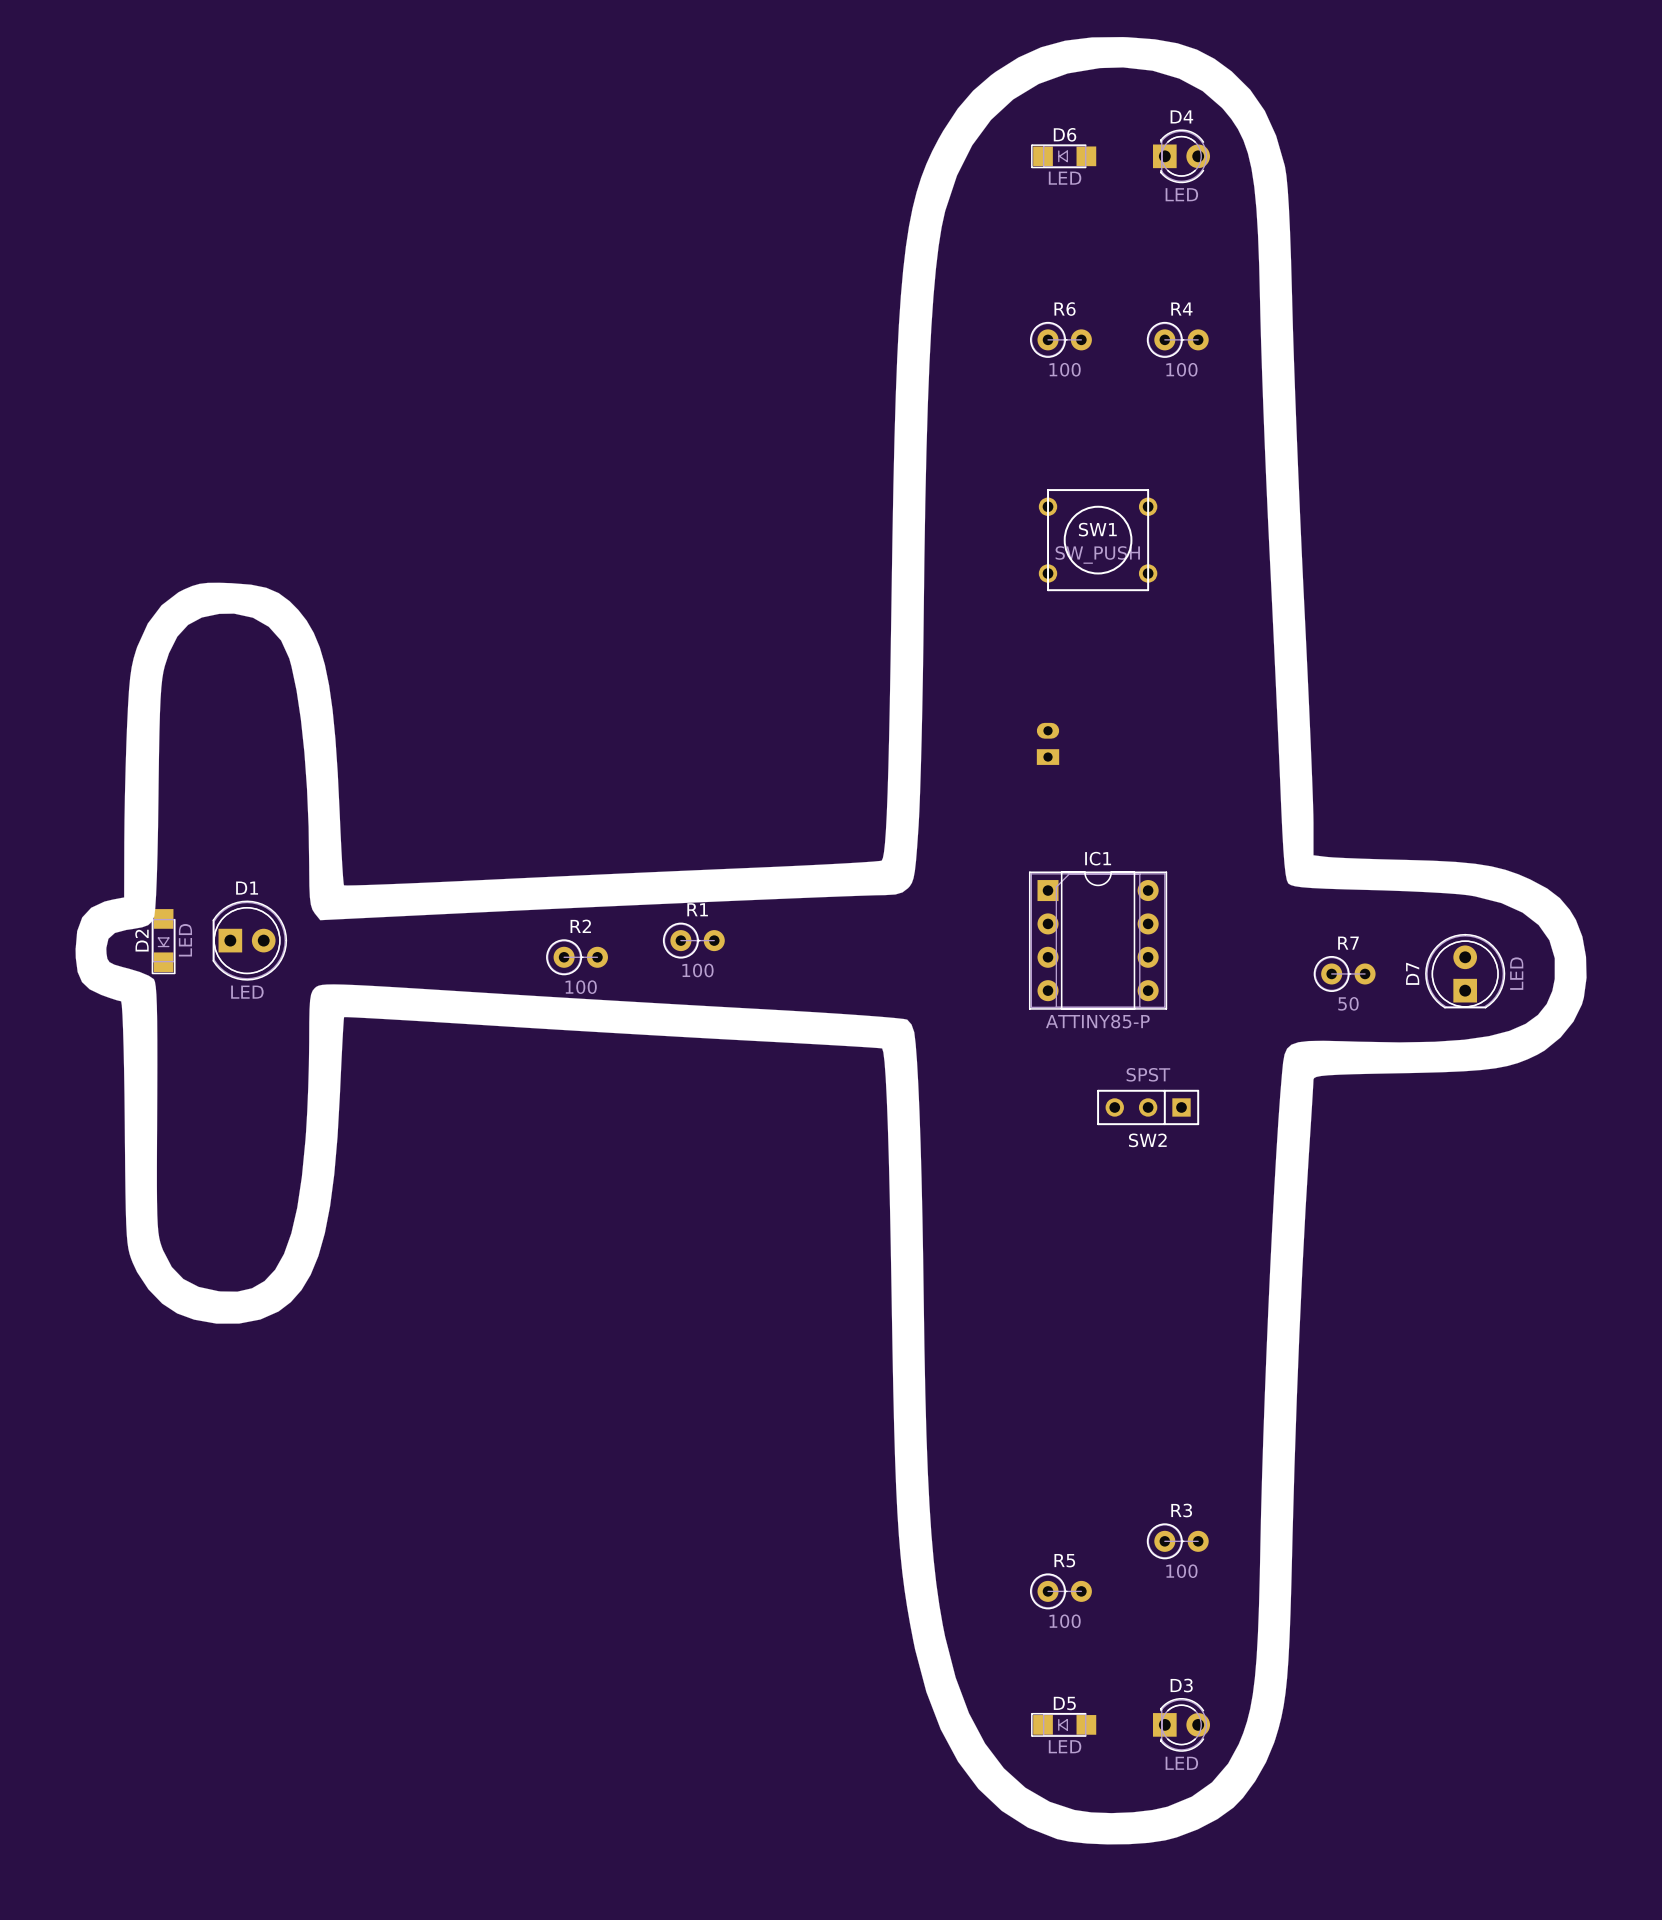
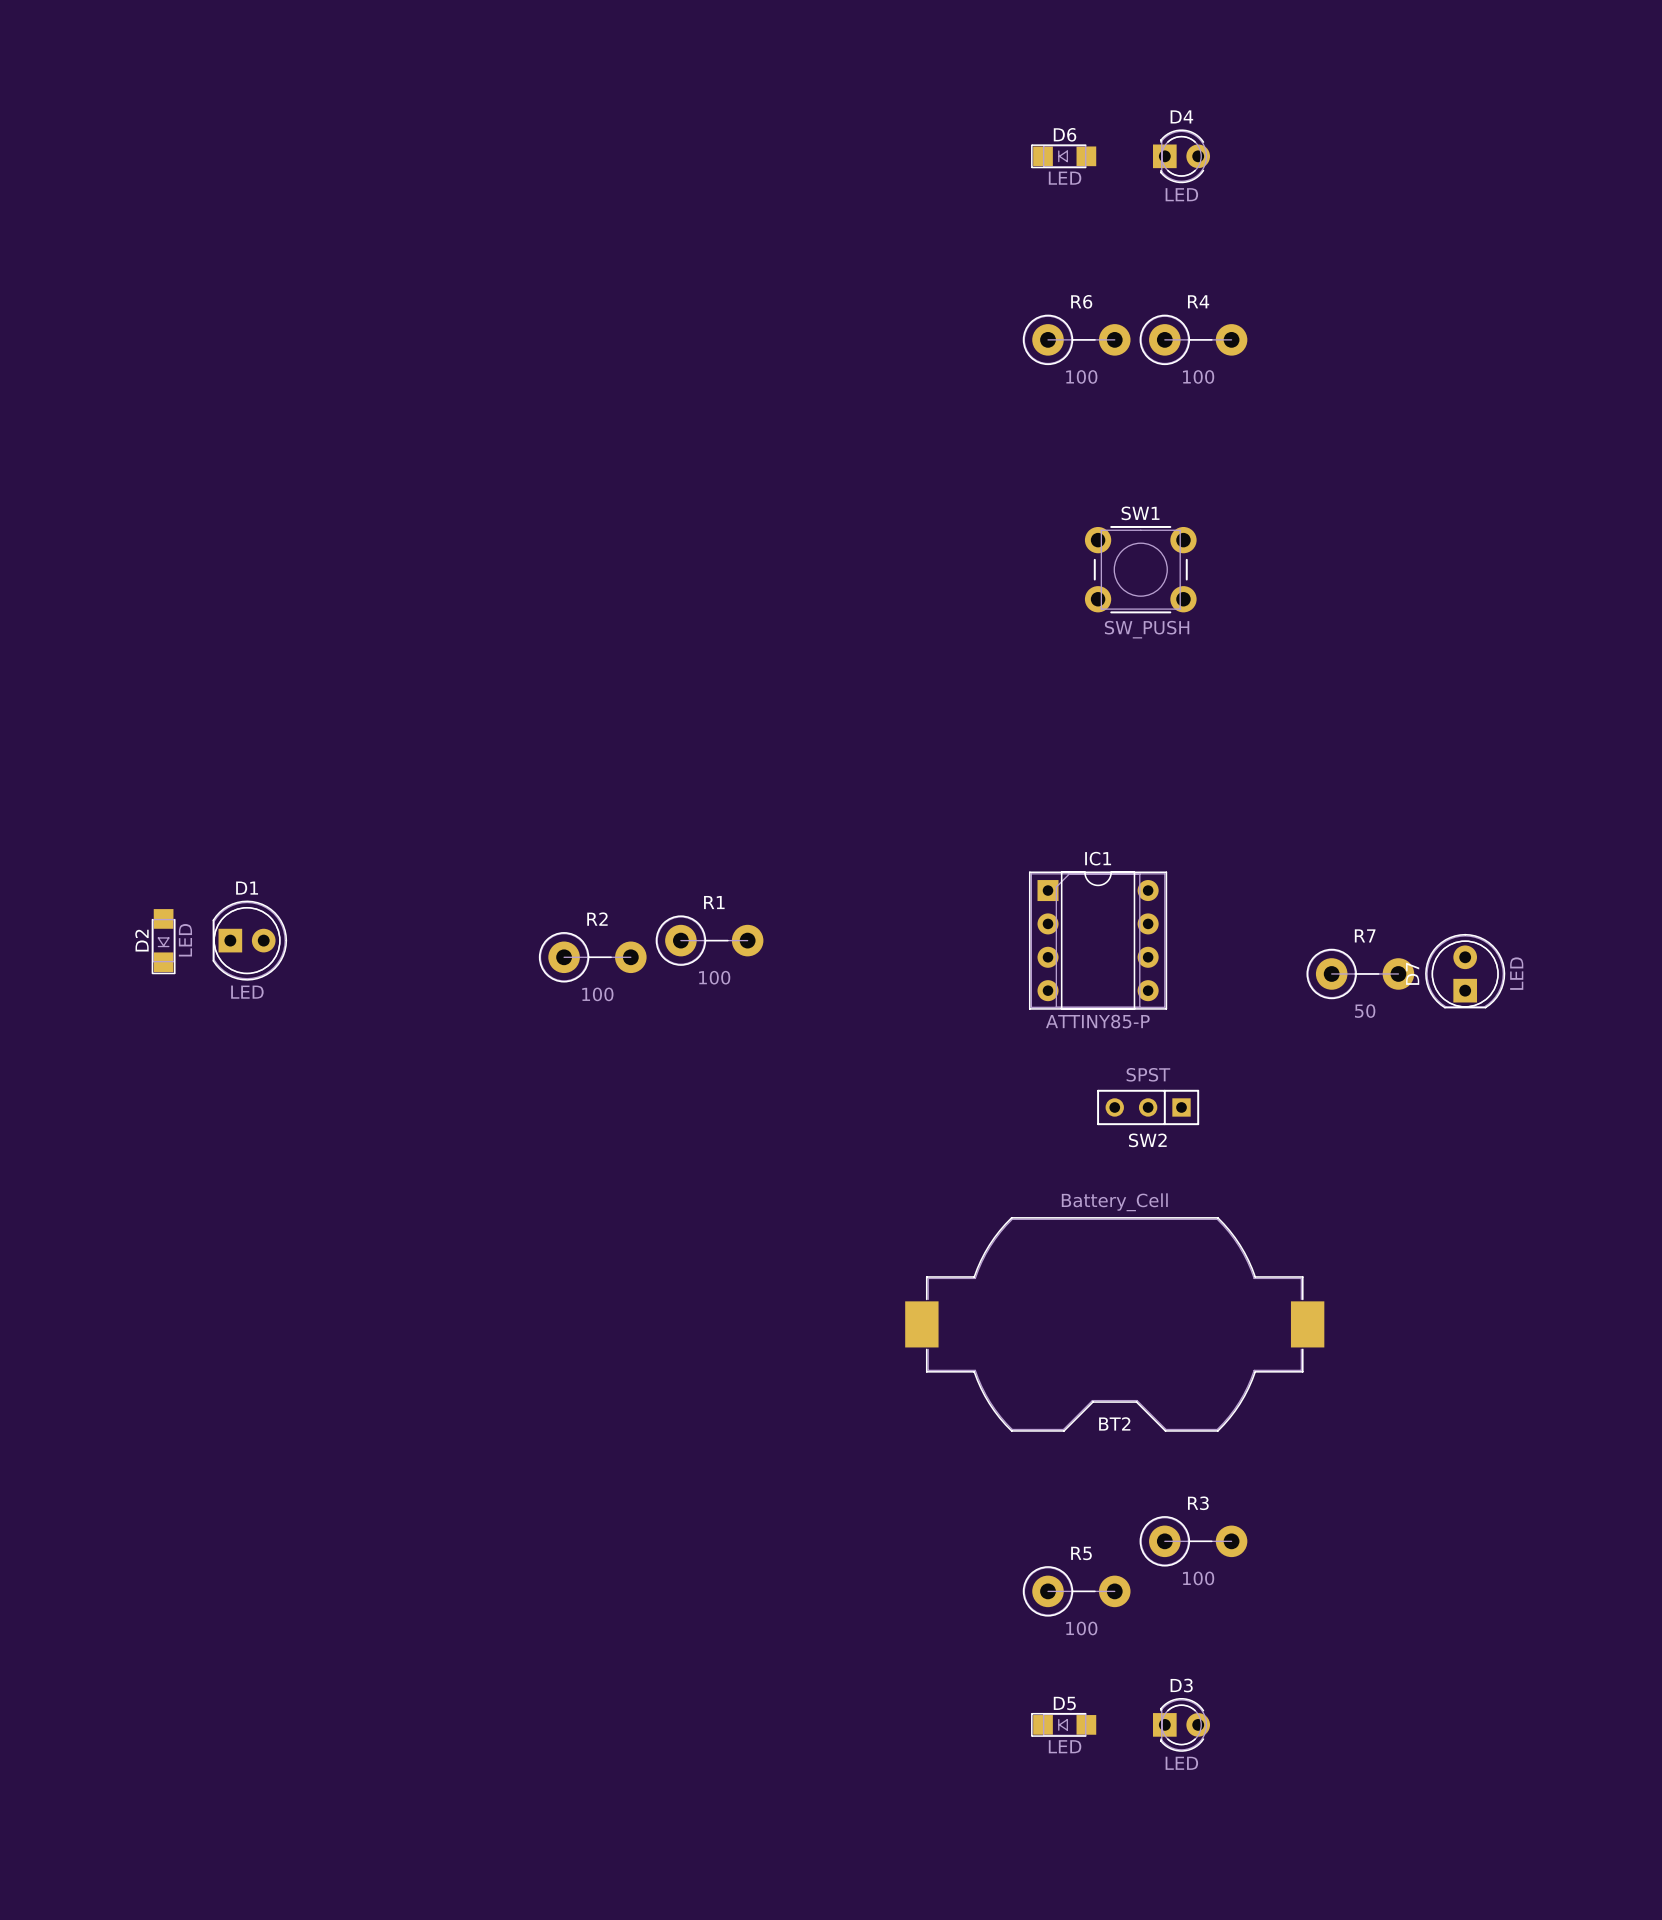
drawing: [75, 37, 1587, 1845] -> none
R6 footprint: [1030, 321, 1092, 358] -> [1022, 314, 1131, 366]
R4 footprint: [1146, 321, 1209, 358] -> [1139, 314, 1248, 366]
SW1 footprint: [1038, 489, 1158, 592] -> [1084, 525, 1197, 614]
SW1 name position: SW1 (1097, 529) -> SW1 (1140, 513)
SW1 value position: SW_PUSH (1097, 554) -> SW_PUSH (1147, 629)
part: (1048, 743) -> none
R1 footprint: [662, 922, 725, 959] -> [655, 915, 764, 966]
R2 footprint: [546, 939, 608, 976] -> [538, 932, 647, 983]
R7 footprint: [1313, 955, 1376, 992] -> [1306, 948, 1415, 1000]
BT2: none -> Battery_Cell (1114, 1324)
R3 footprint: [1146, 1523, 1209, 1560] -> [1139, 1516, 1248, 1567]
R5 footprint: [1030, 1573, 1092, 1610] -> [1022, 1566, 1131, 1617]

